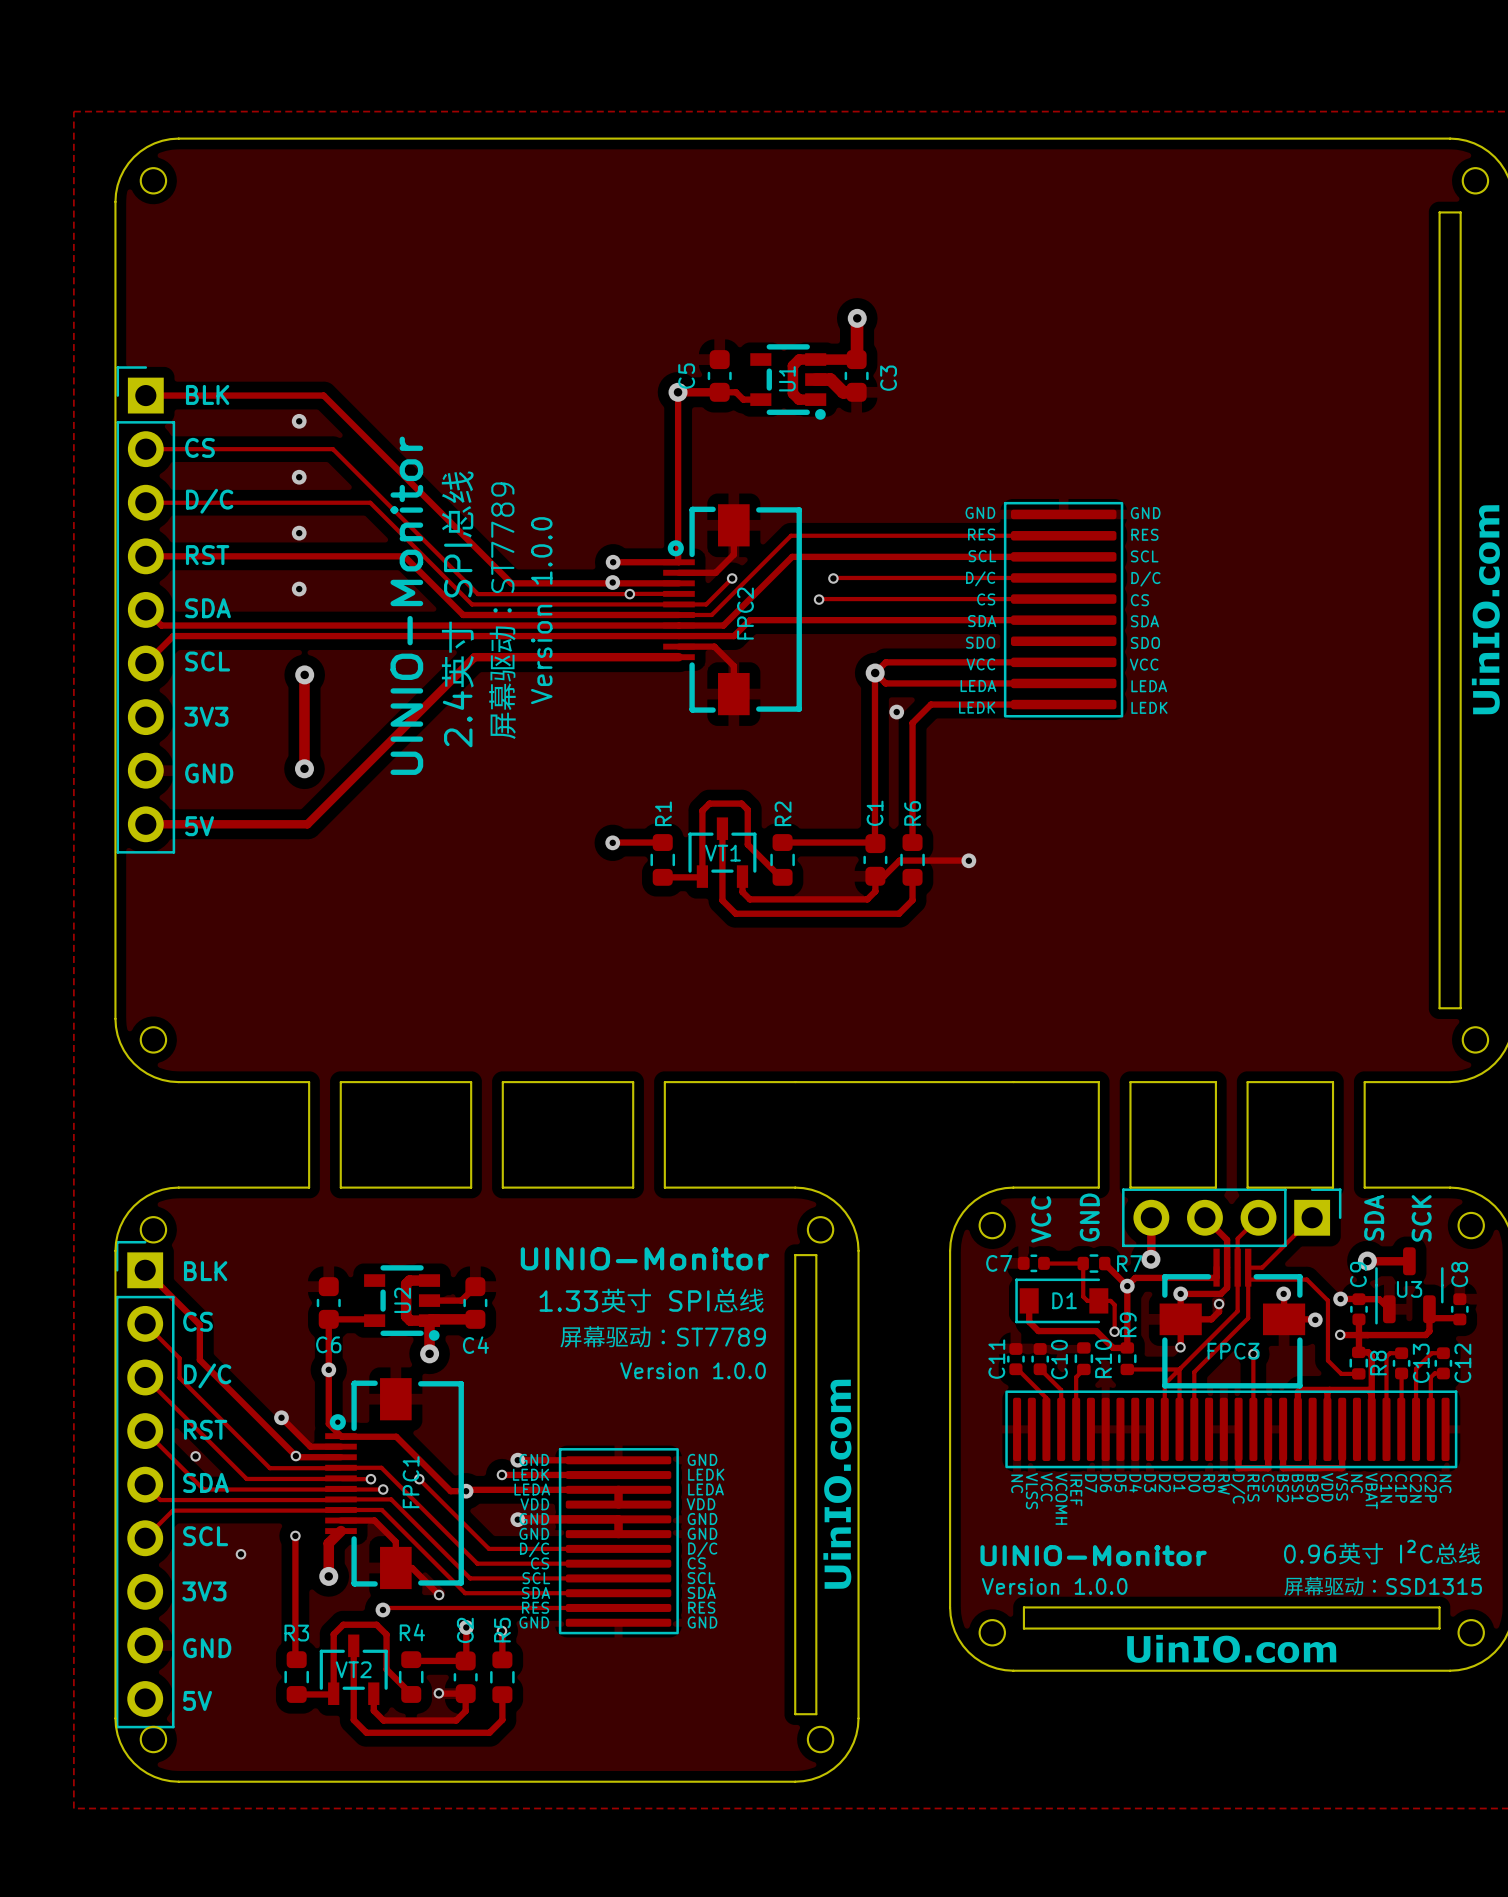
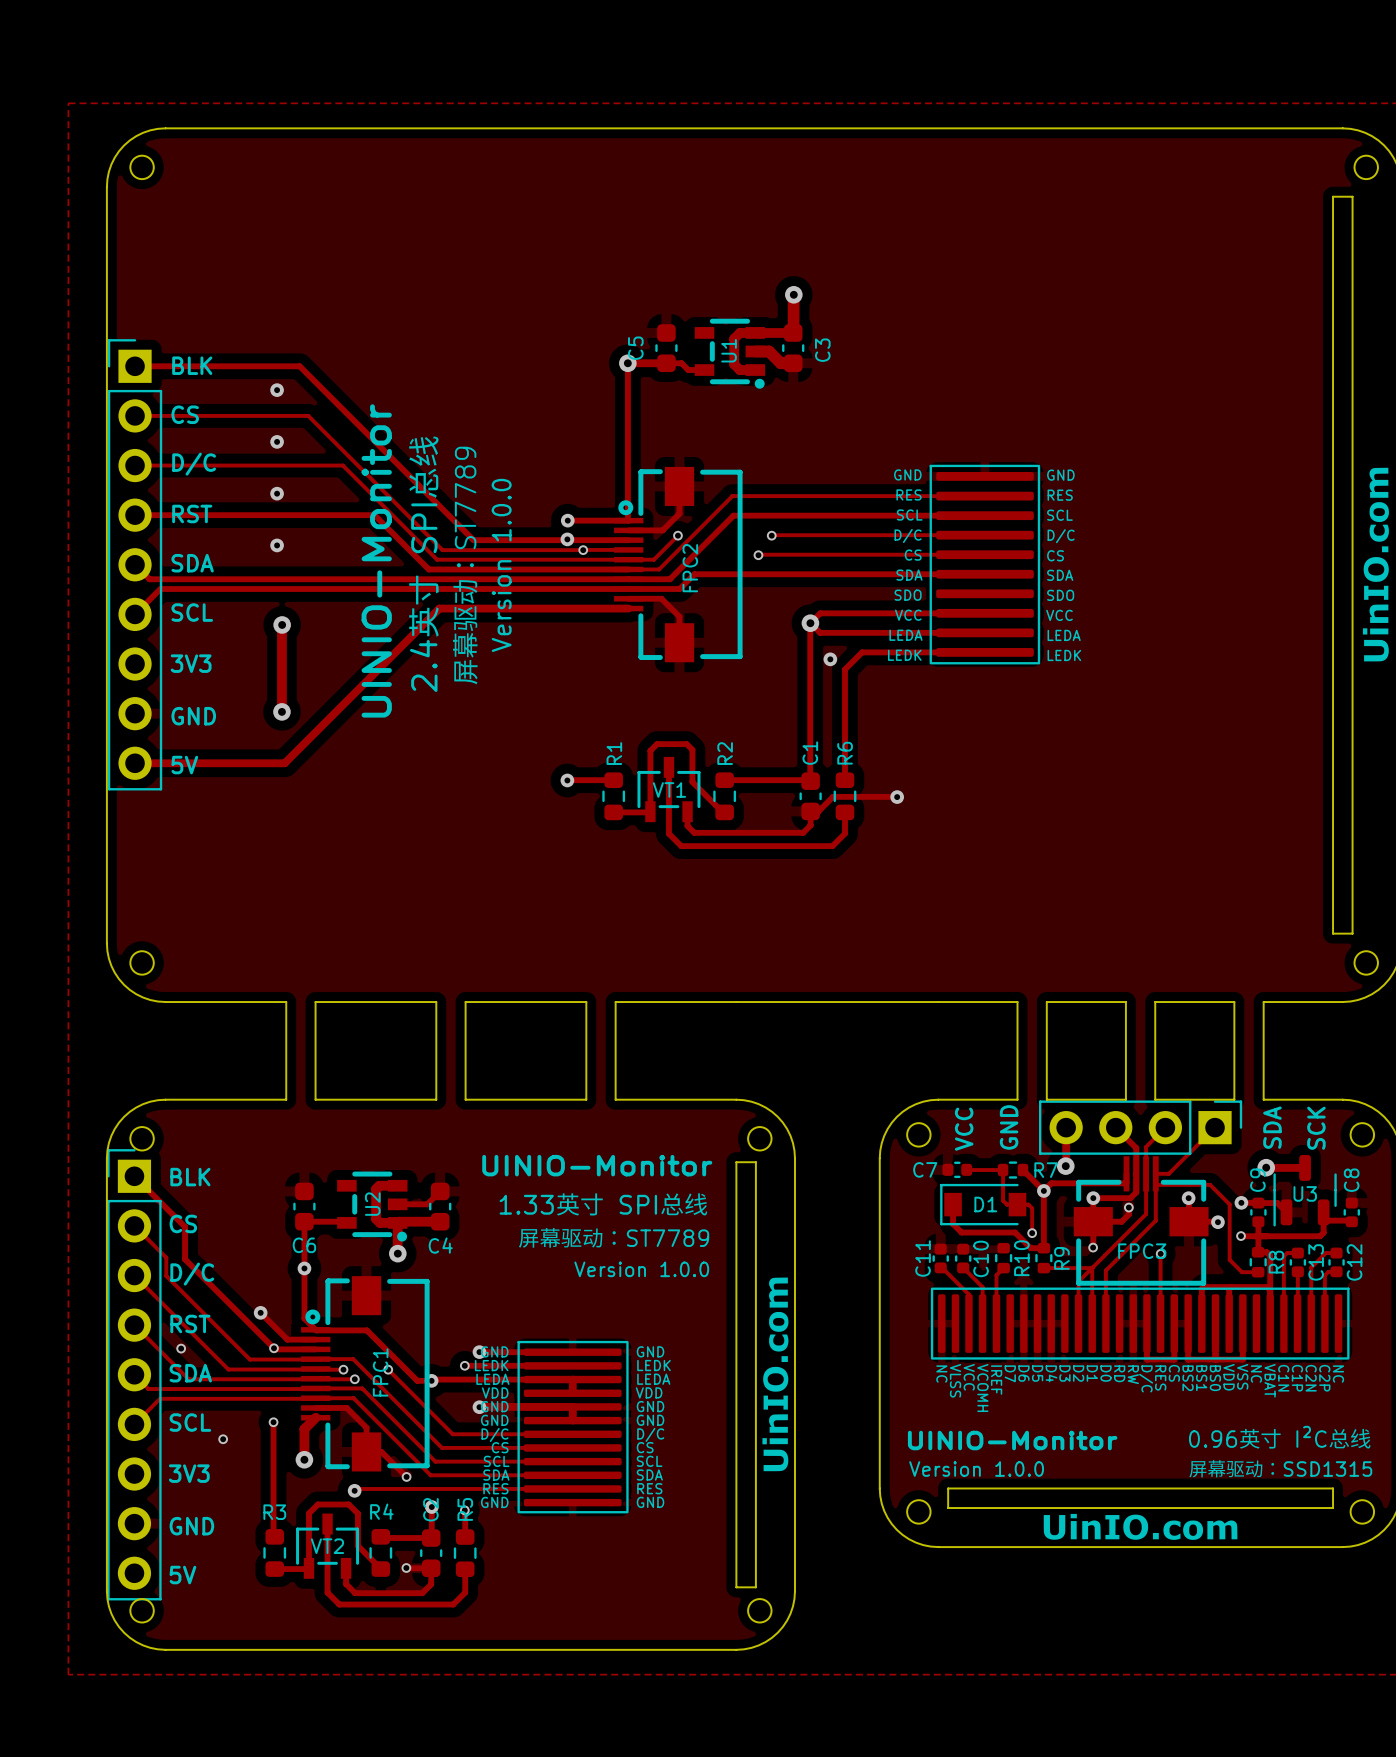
R9 name position: R9 (1128, 1324) -> R9 (1061, 1258)

